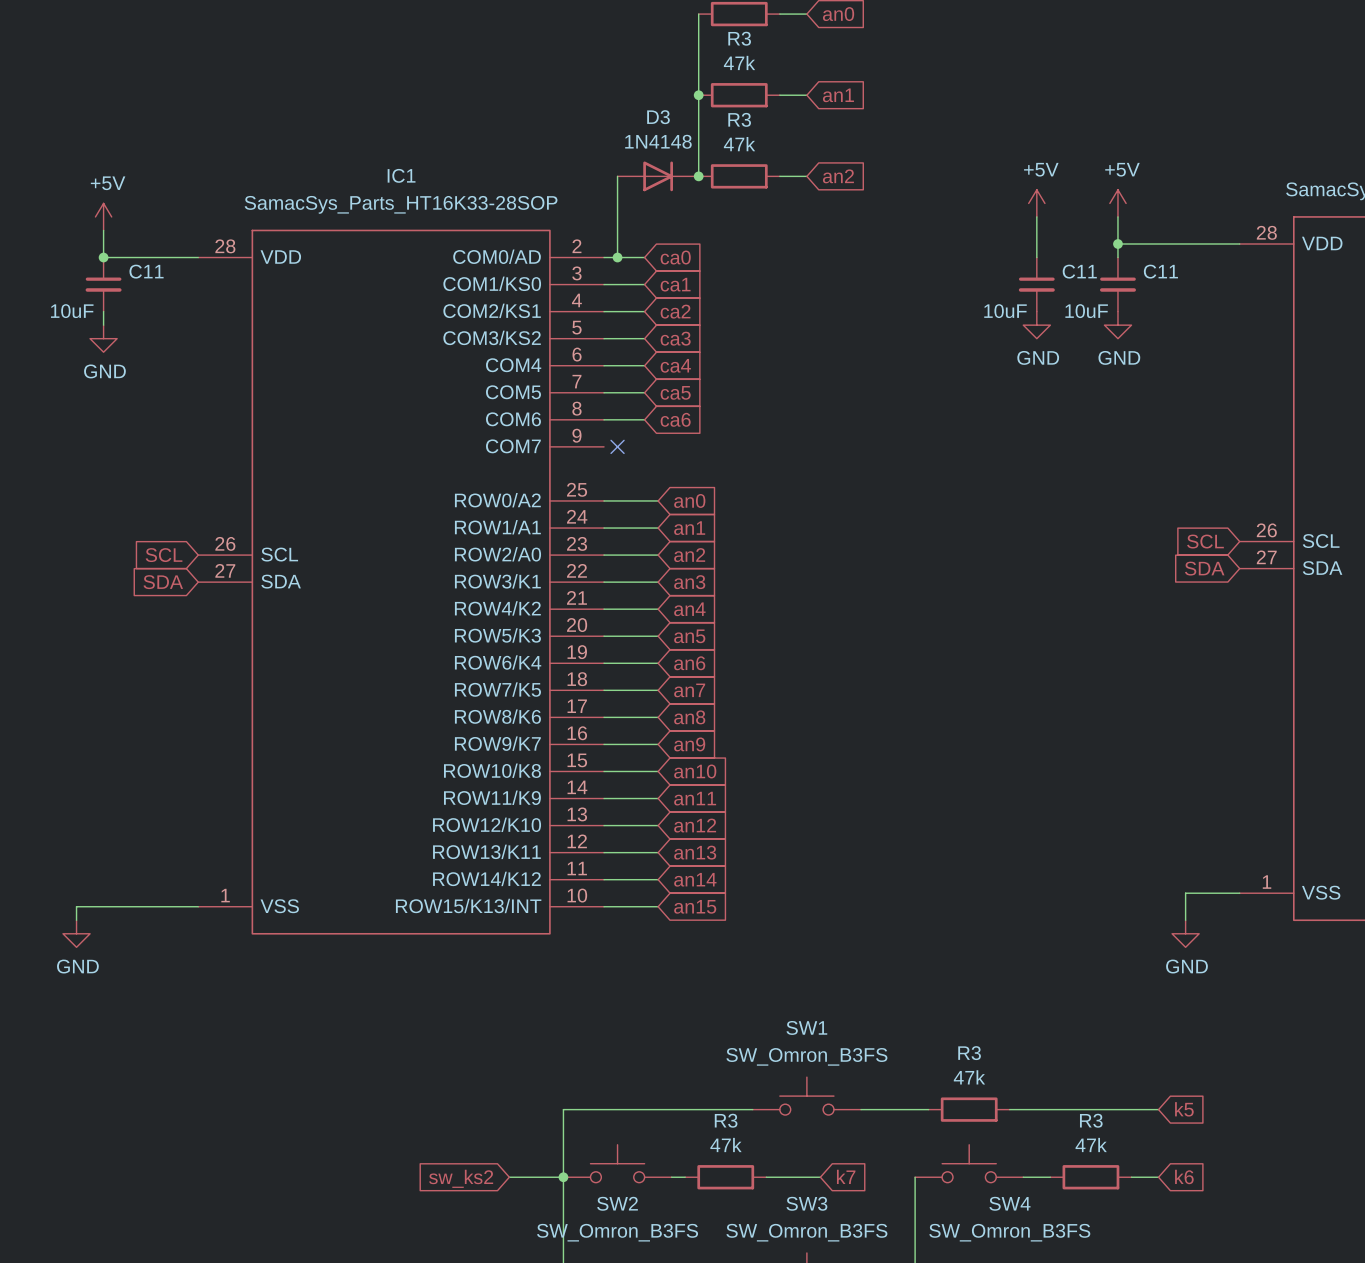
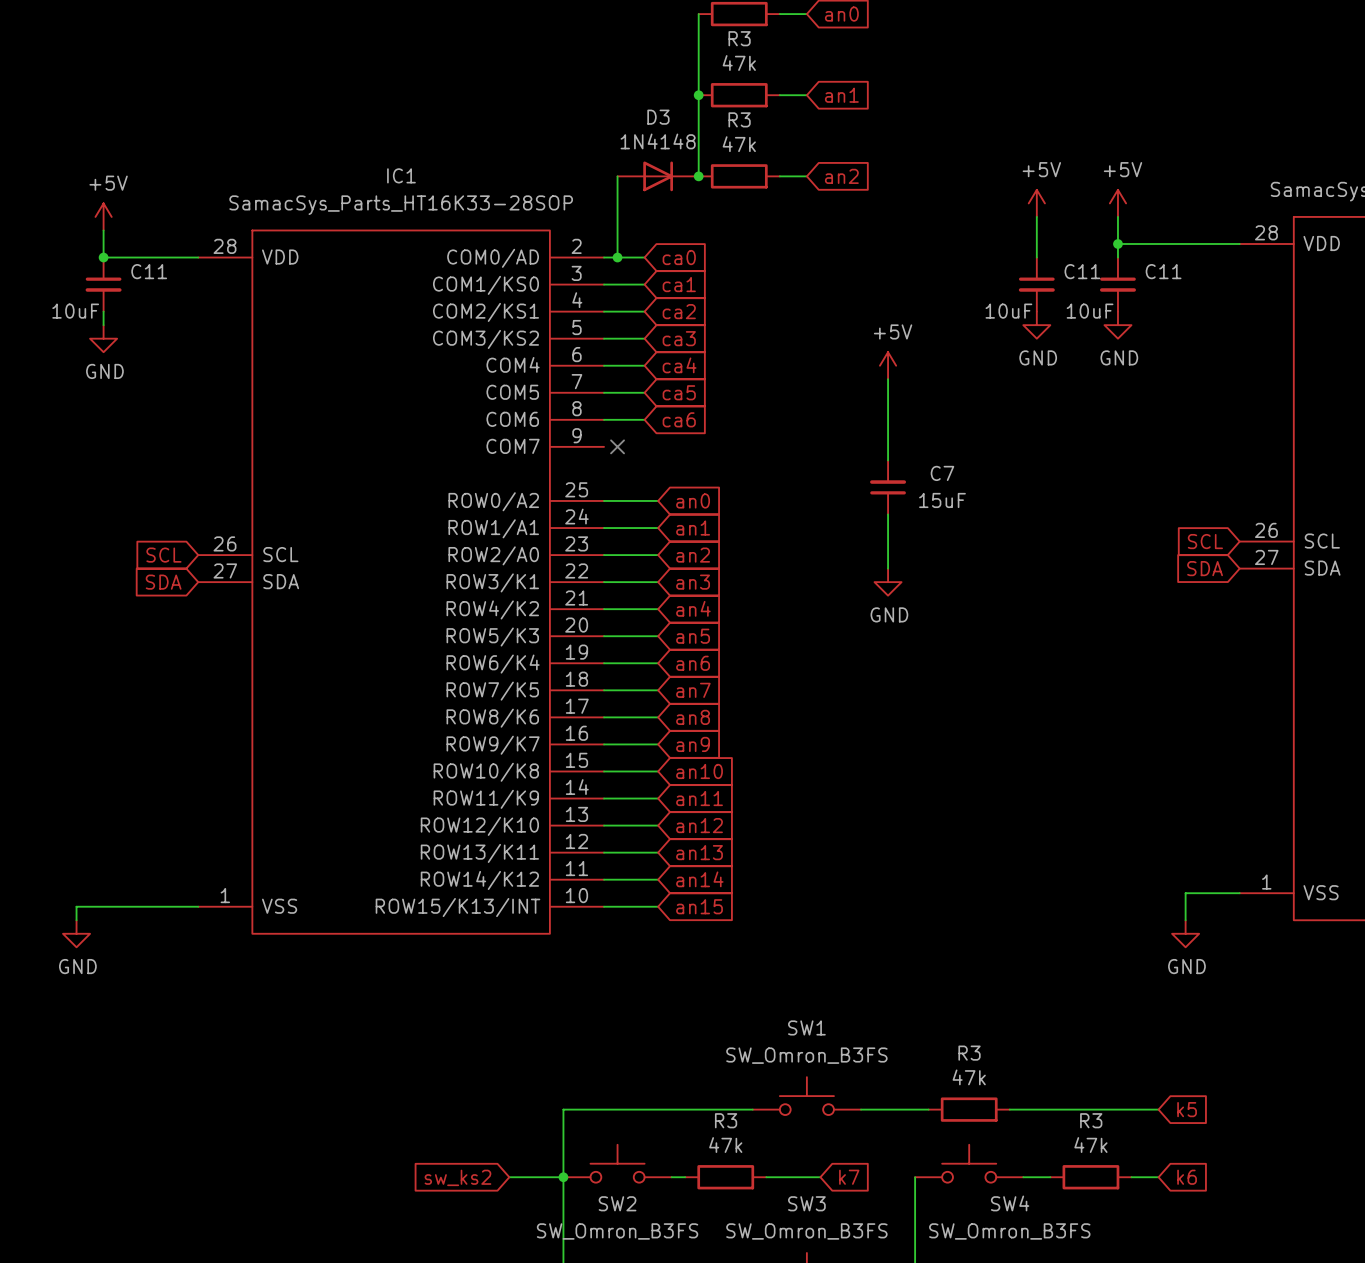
power symbol: none -> +5V (888, 365)
wire: none -> (888, 379) (888, 460)
C7: none -> 15uF (888, 487)
wire: none -> (888, 514) (888, 568)
power symbol: none -> GND (888, 582)

